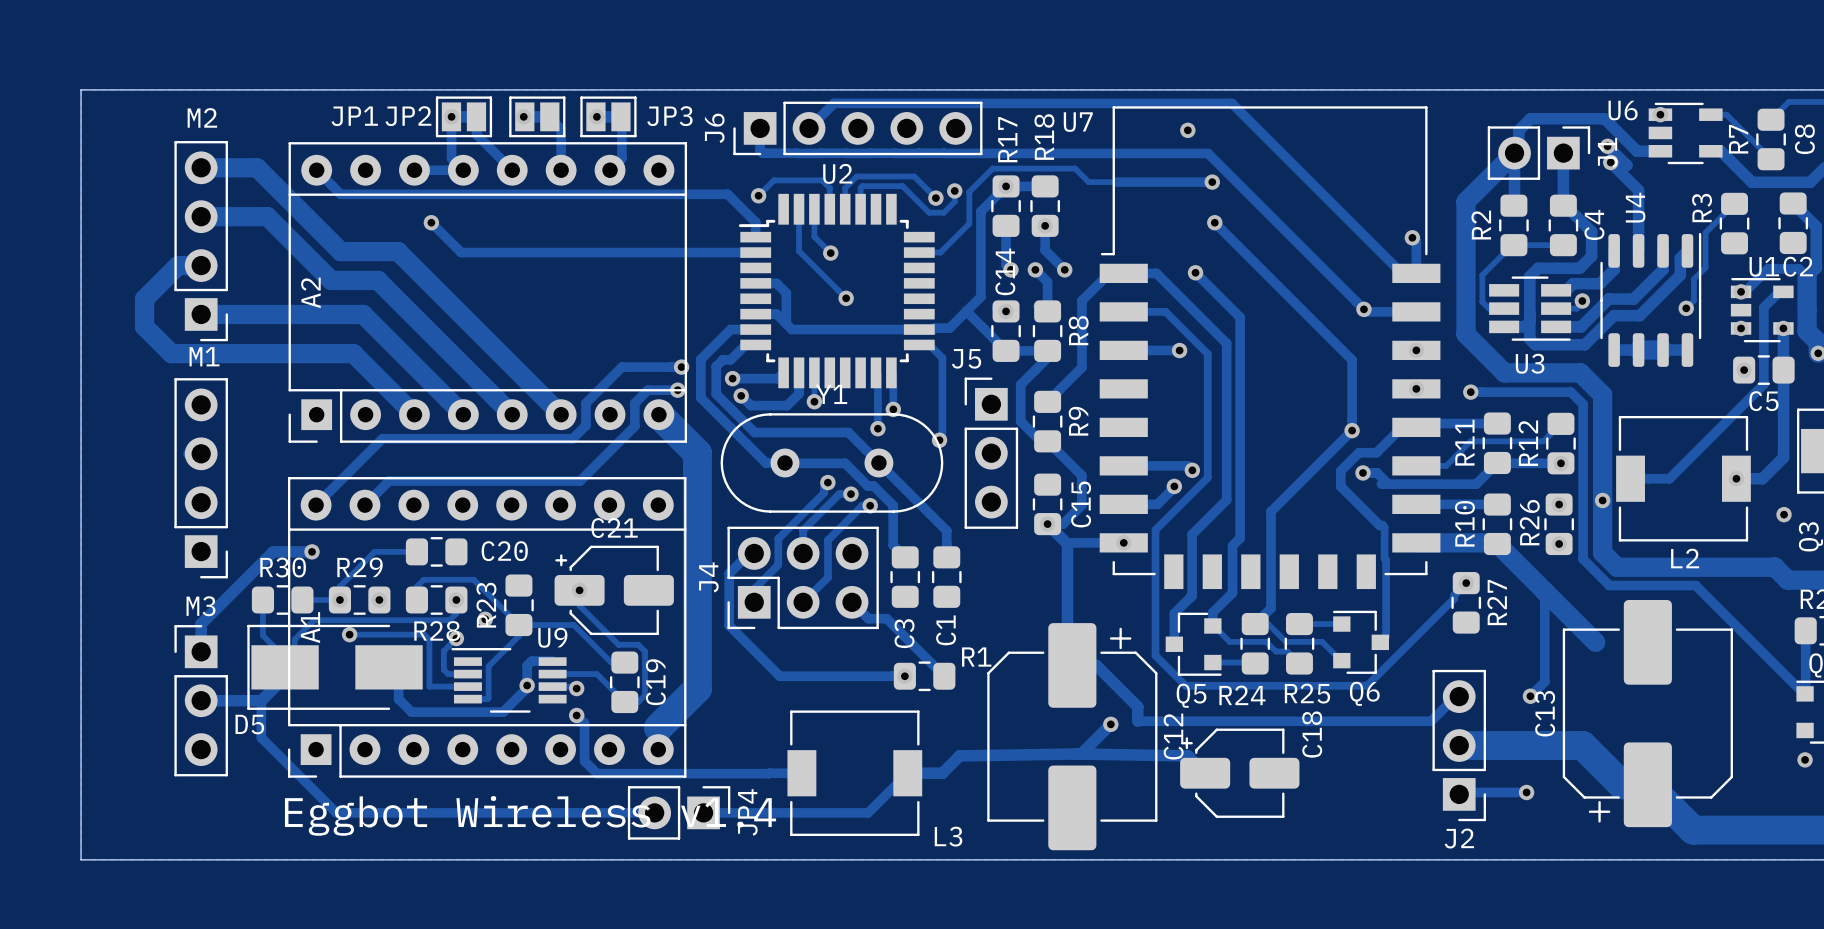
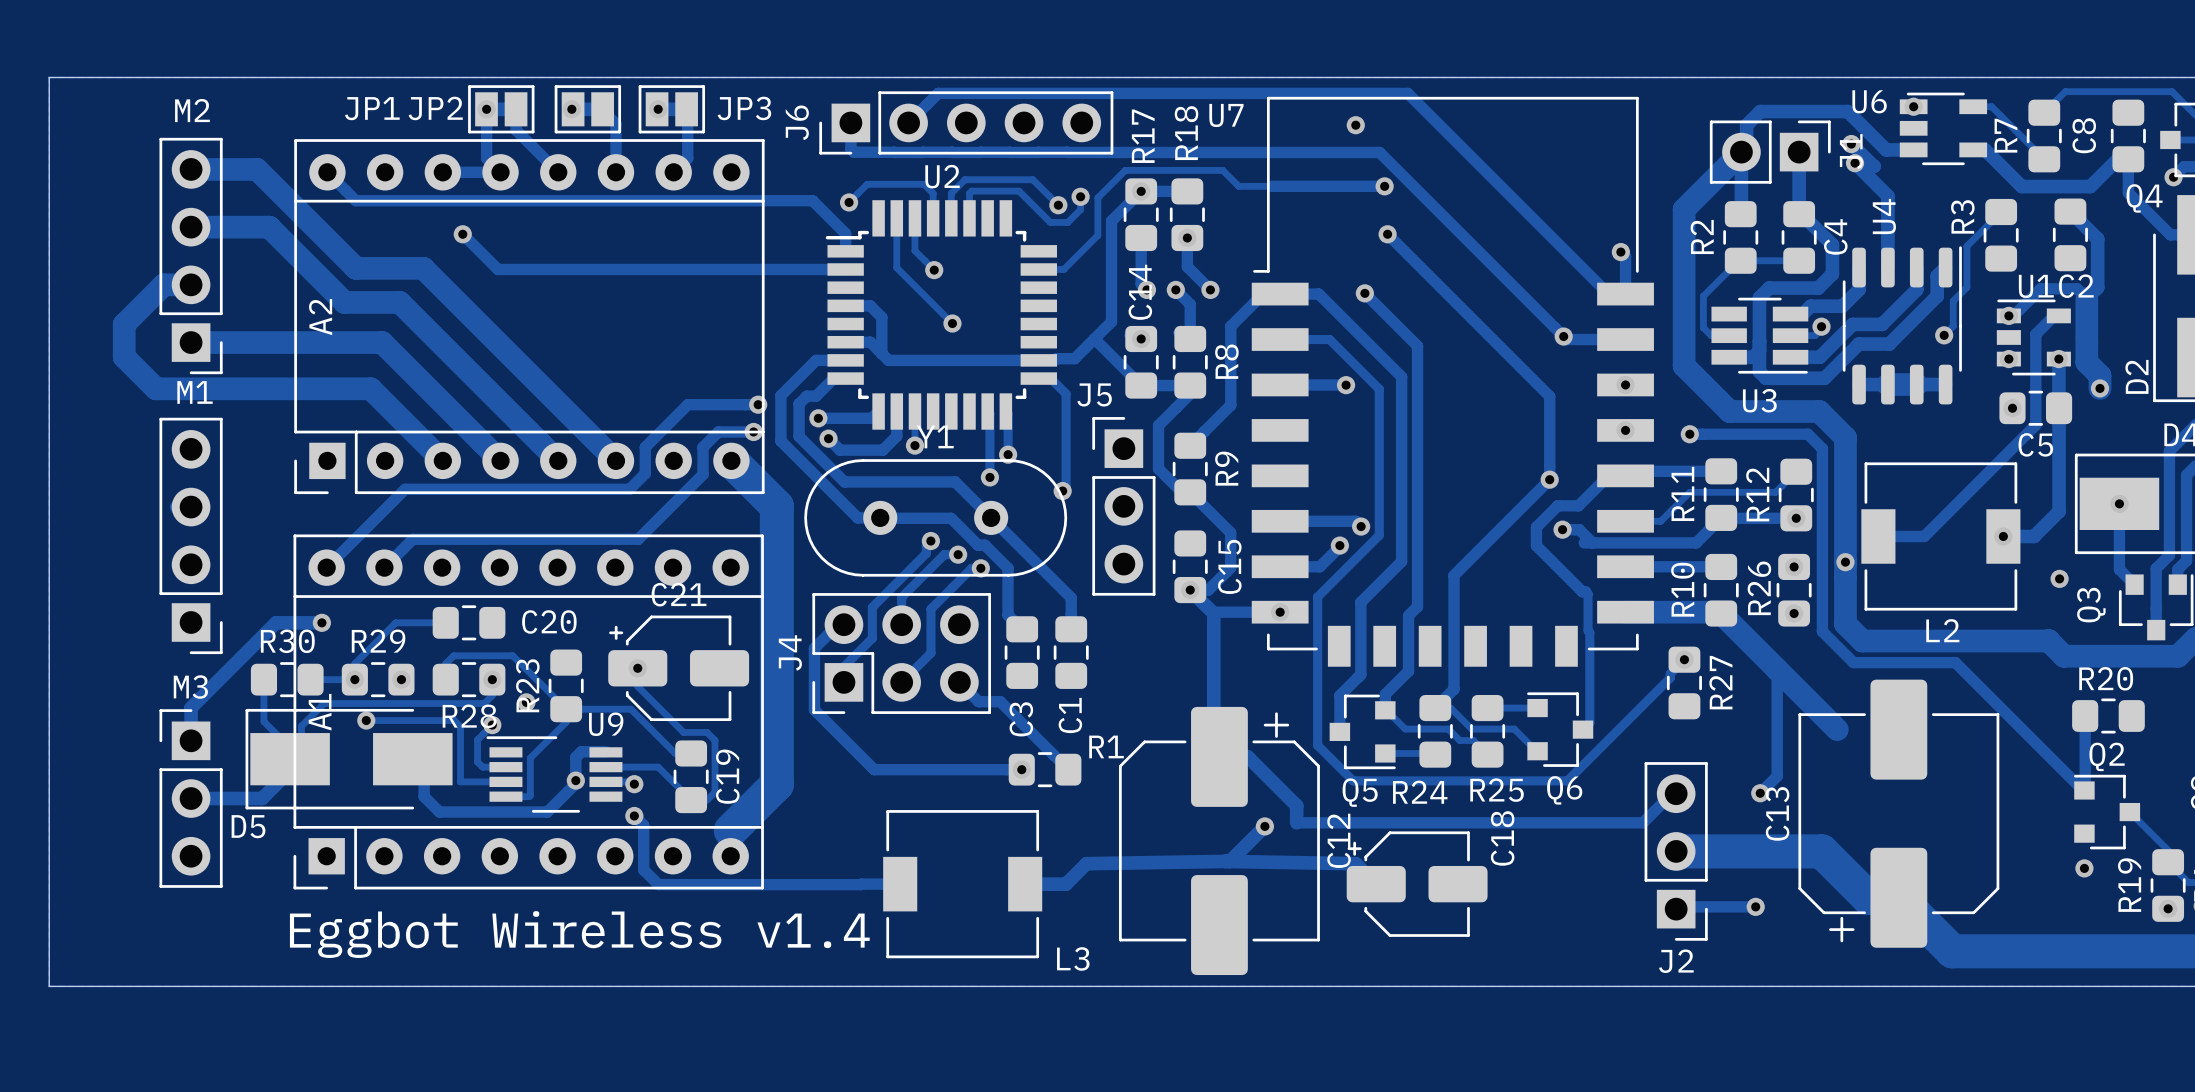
track: (261, 700) (261, 737) (336, 812) (654, 812) -> none
track: (907, 773) (868, 812) (703, 812) -> none
JP4: (679, 812) -> none

